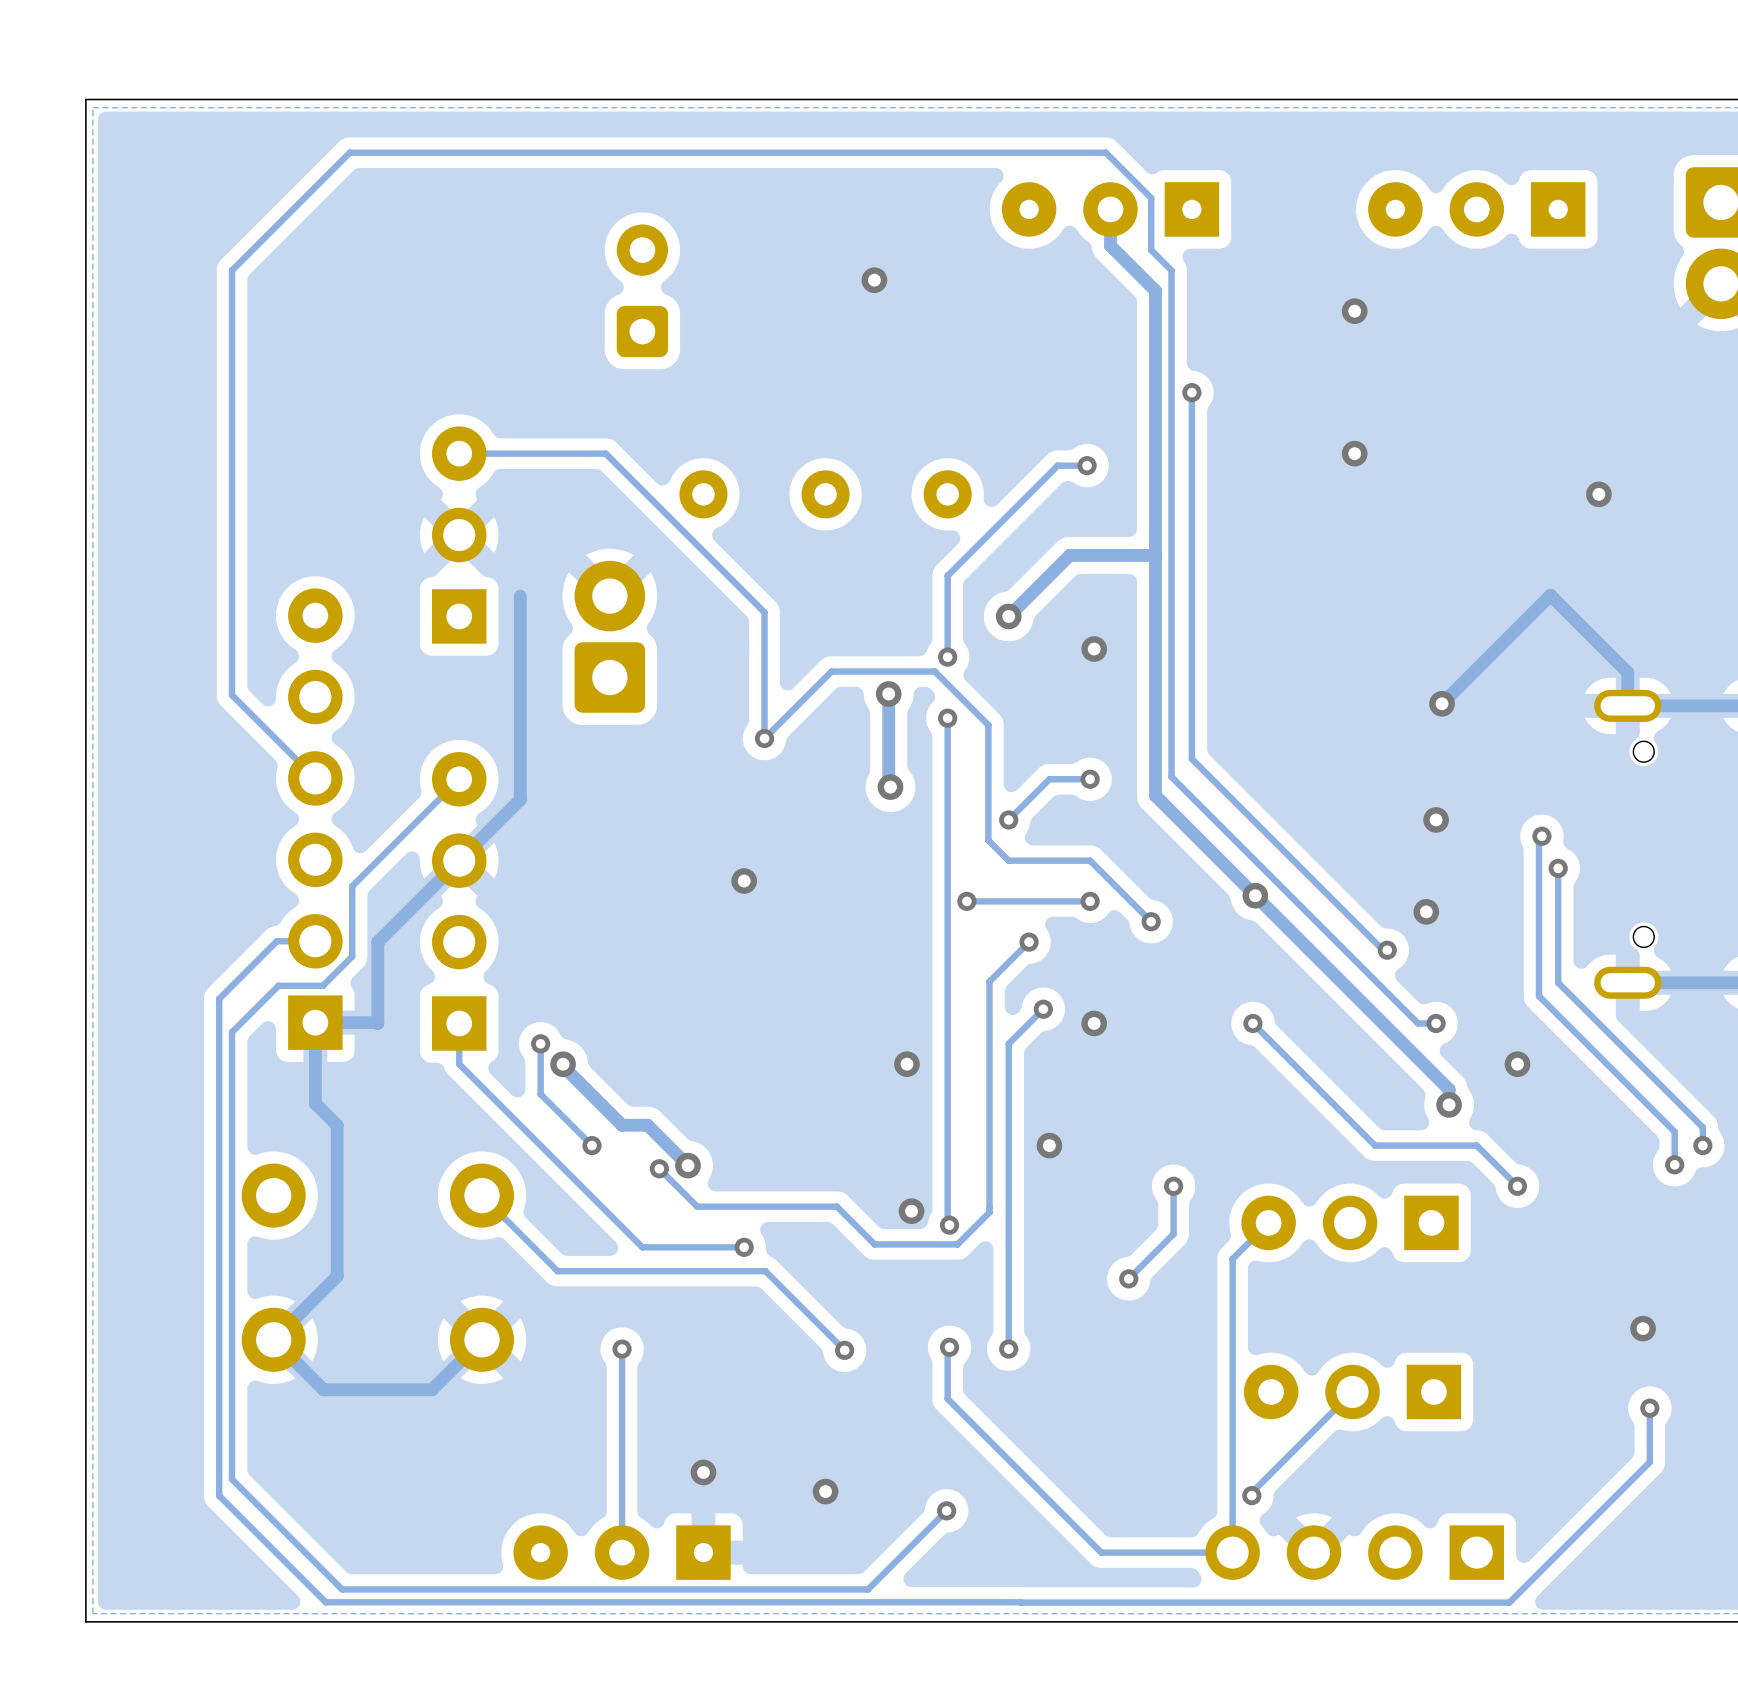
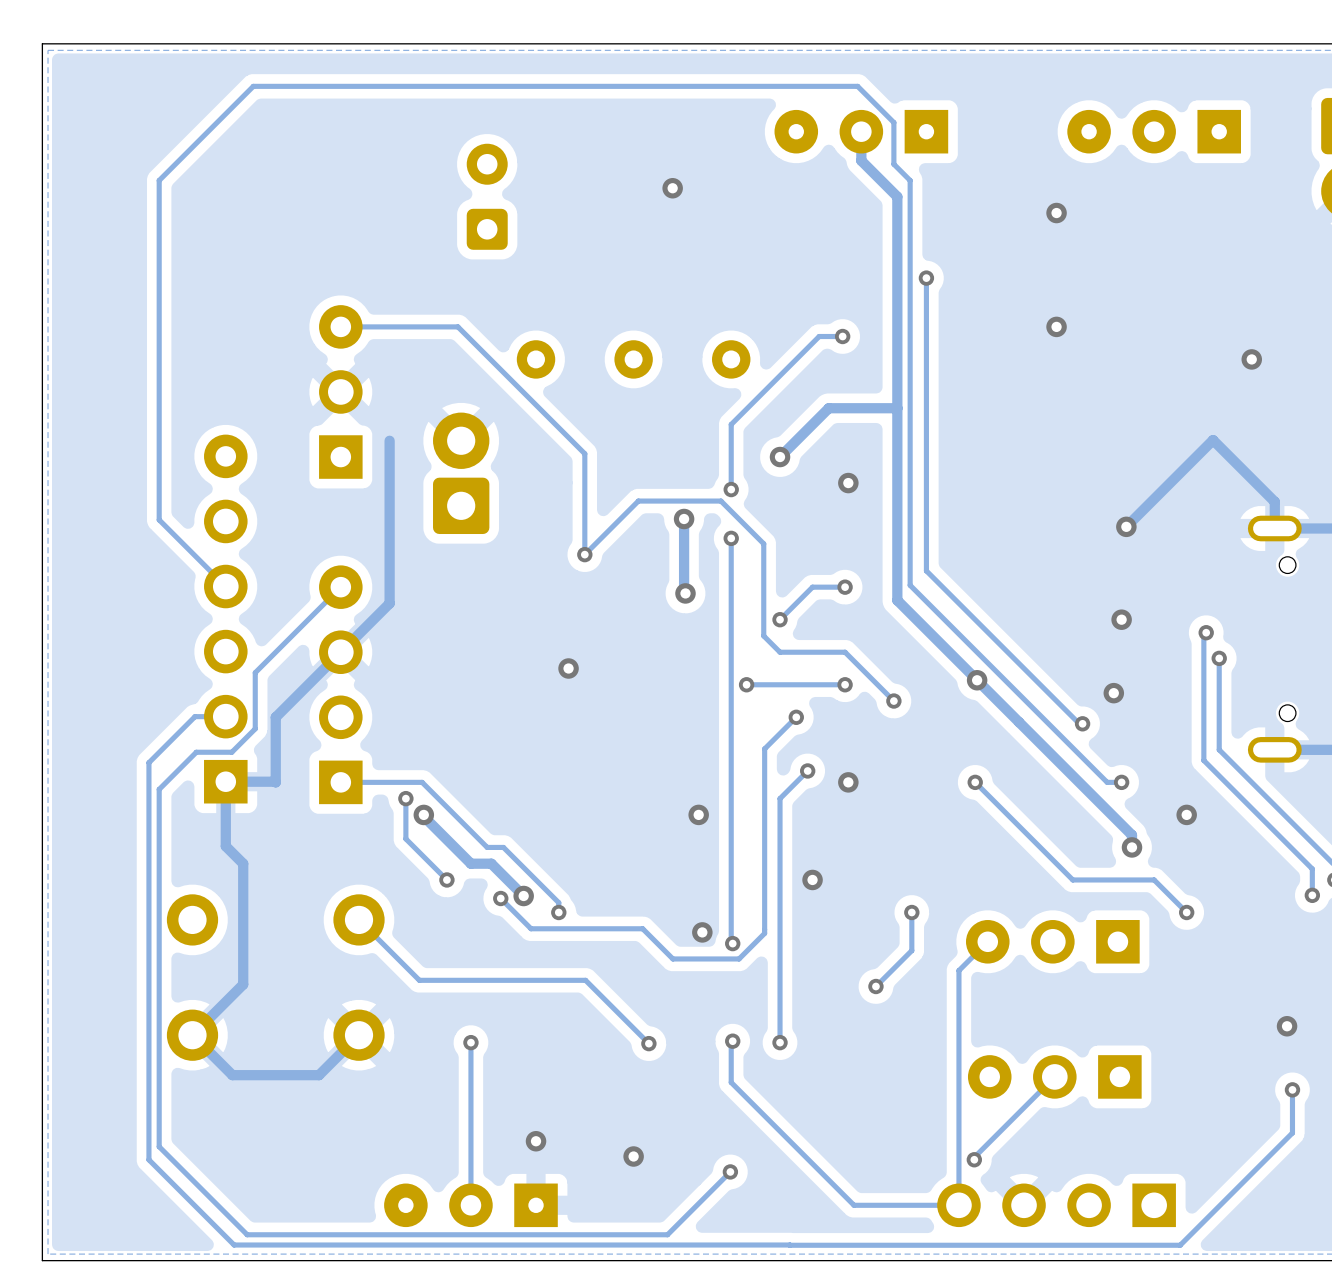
track: (459, 1023) (459, 1064) (642, 1247) (744, 1247) (739, 1251) -> (340, 782) (422, 782) (487, 847) (503, 847) (558, 902) (558, 912)
via position: (744, 1247) -> (558, 912)

